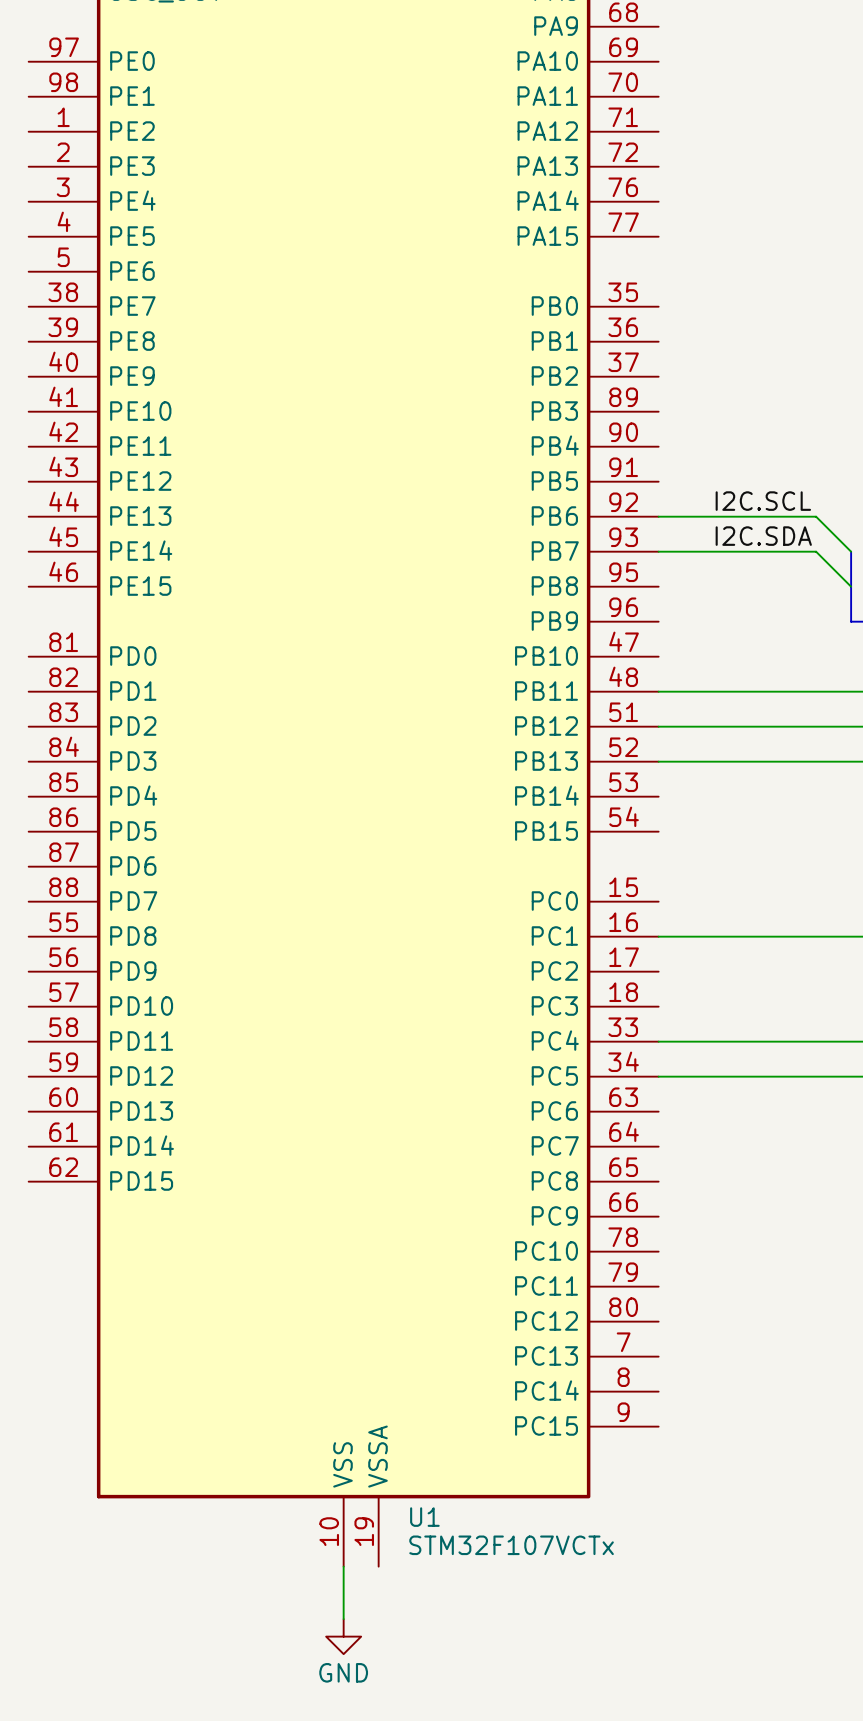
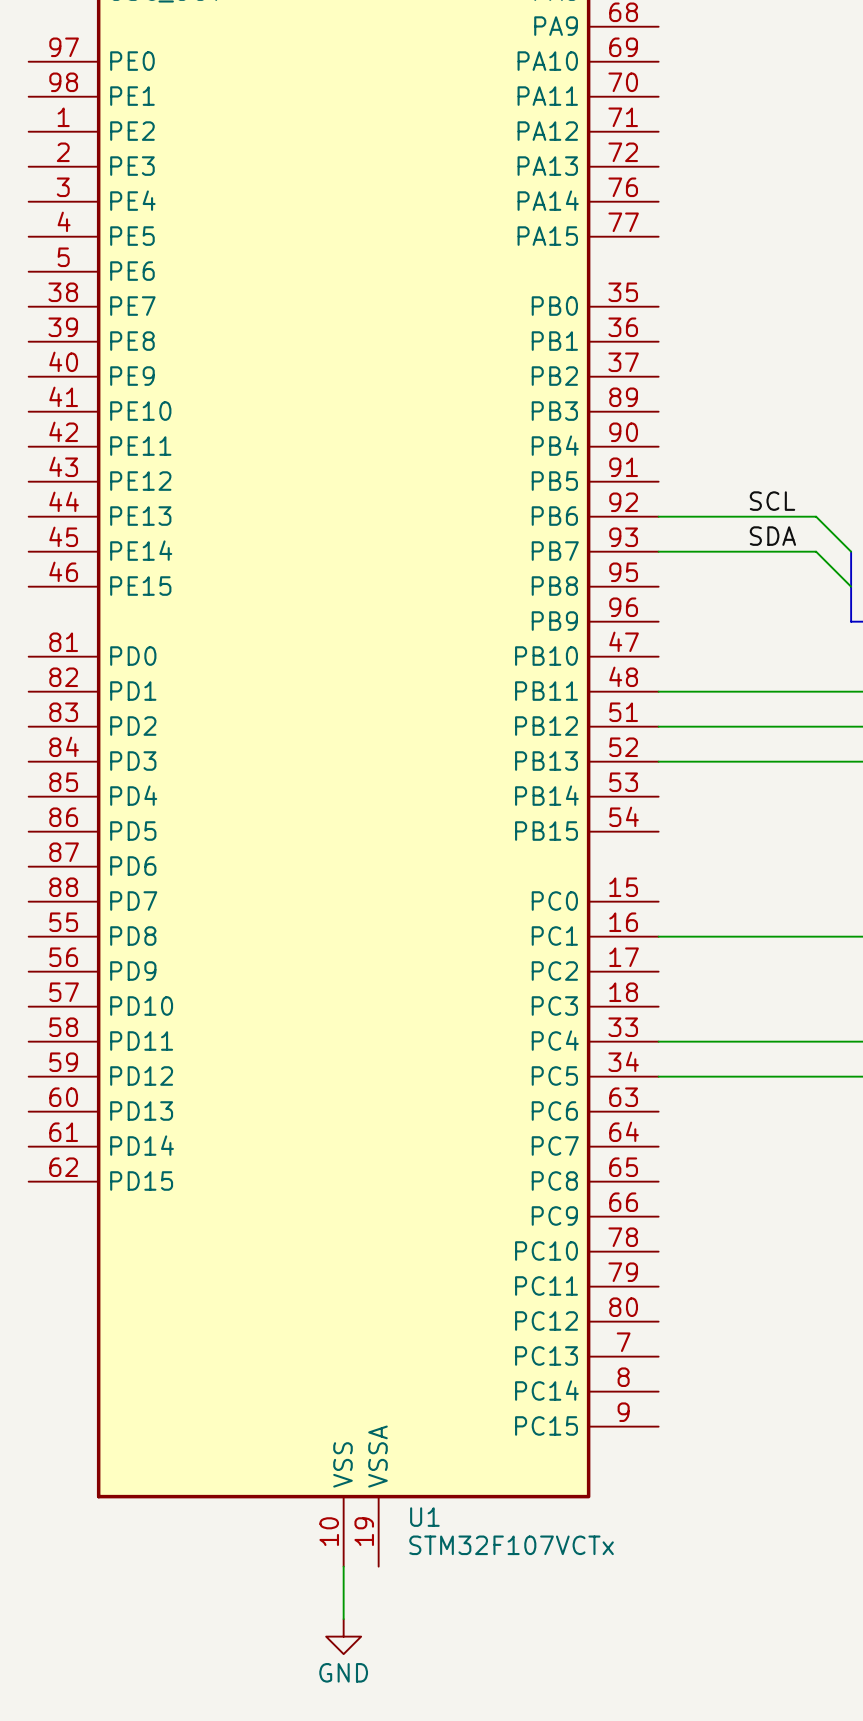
label: I2C.SCL (763, 501) -> none
label: none -> SCL (772, 501)
label: I2C.SDA (763, 536) -> none
label: none -> SDA (772, 536)

